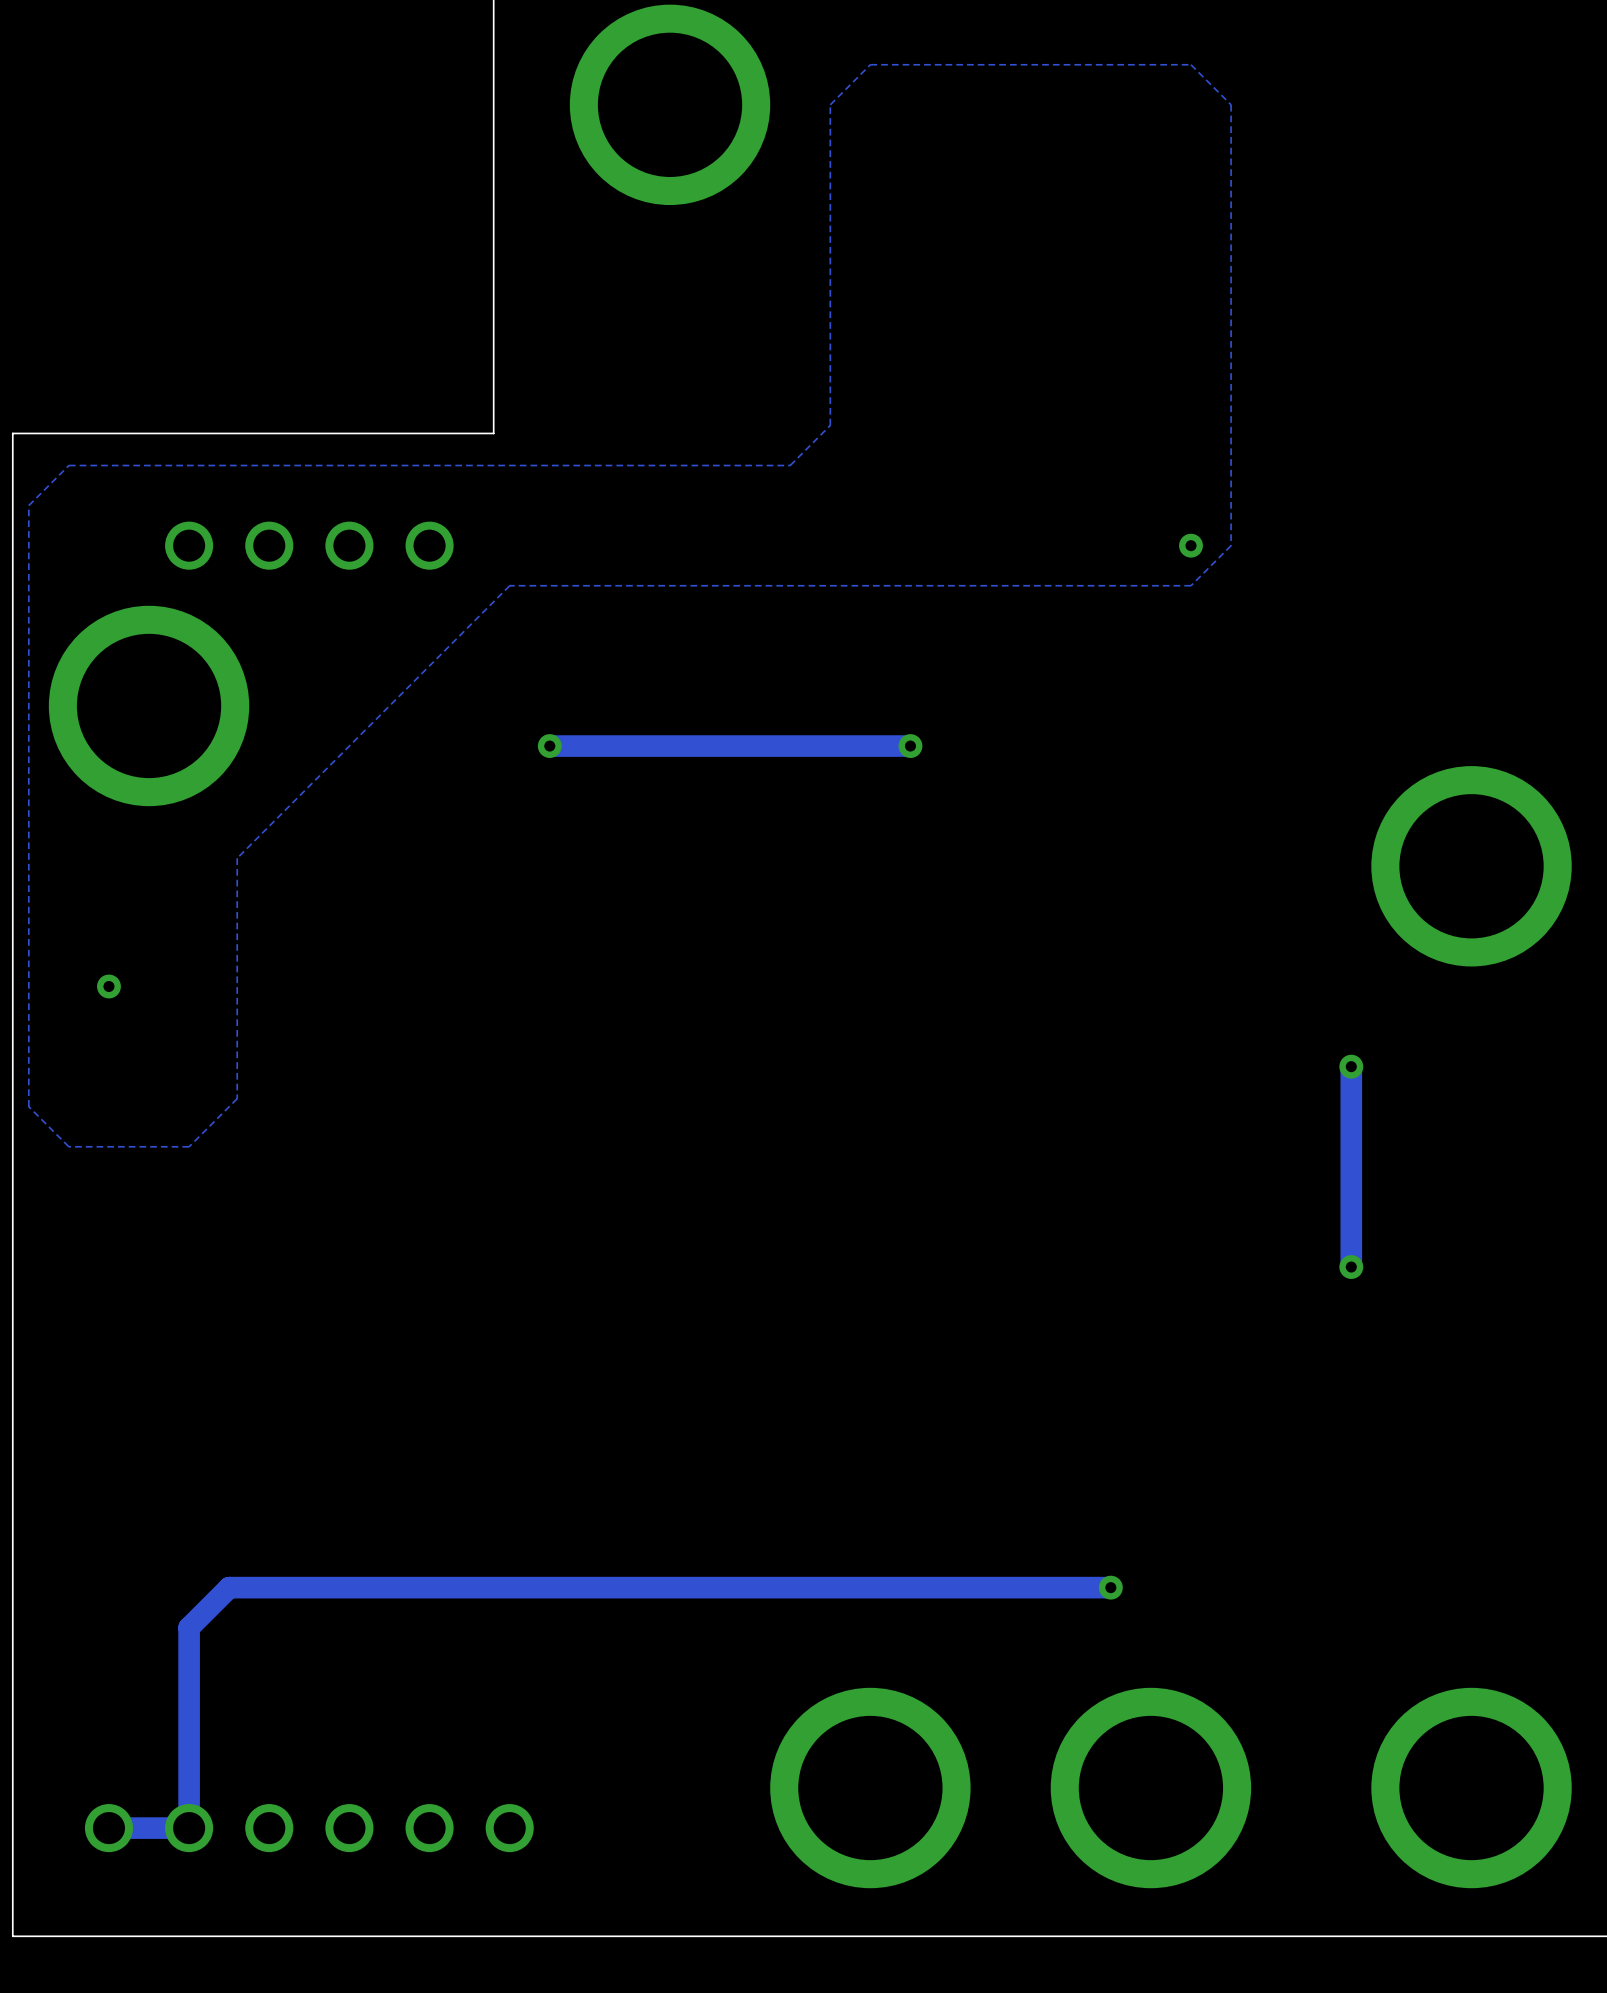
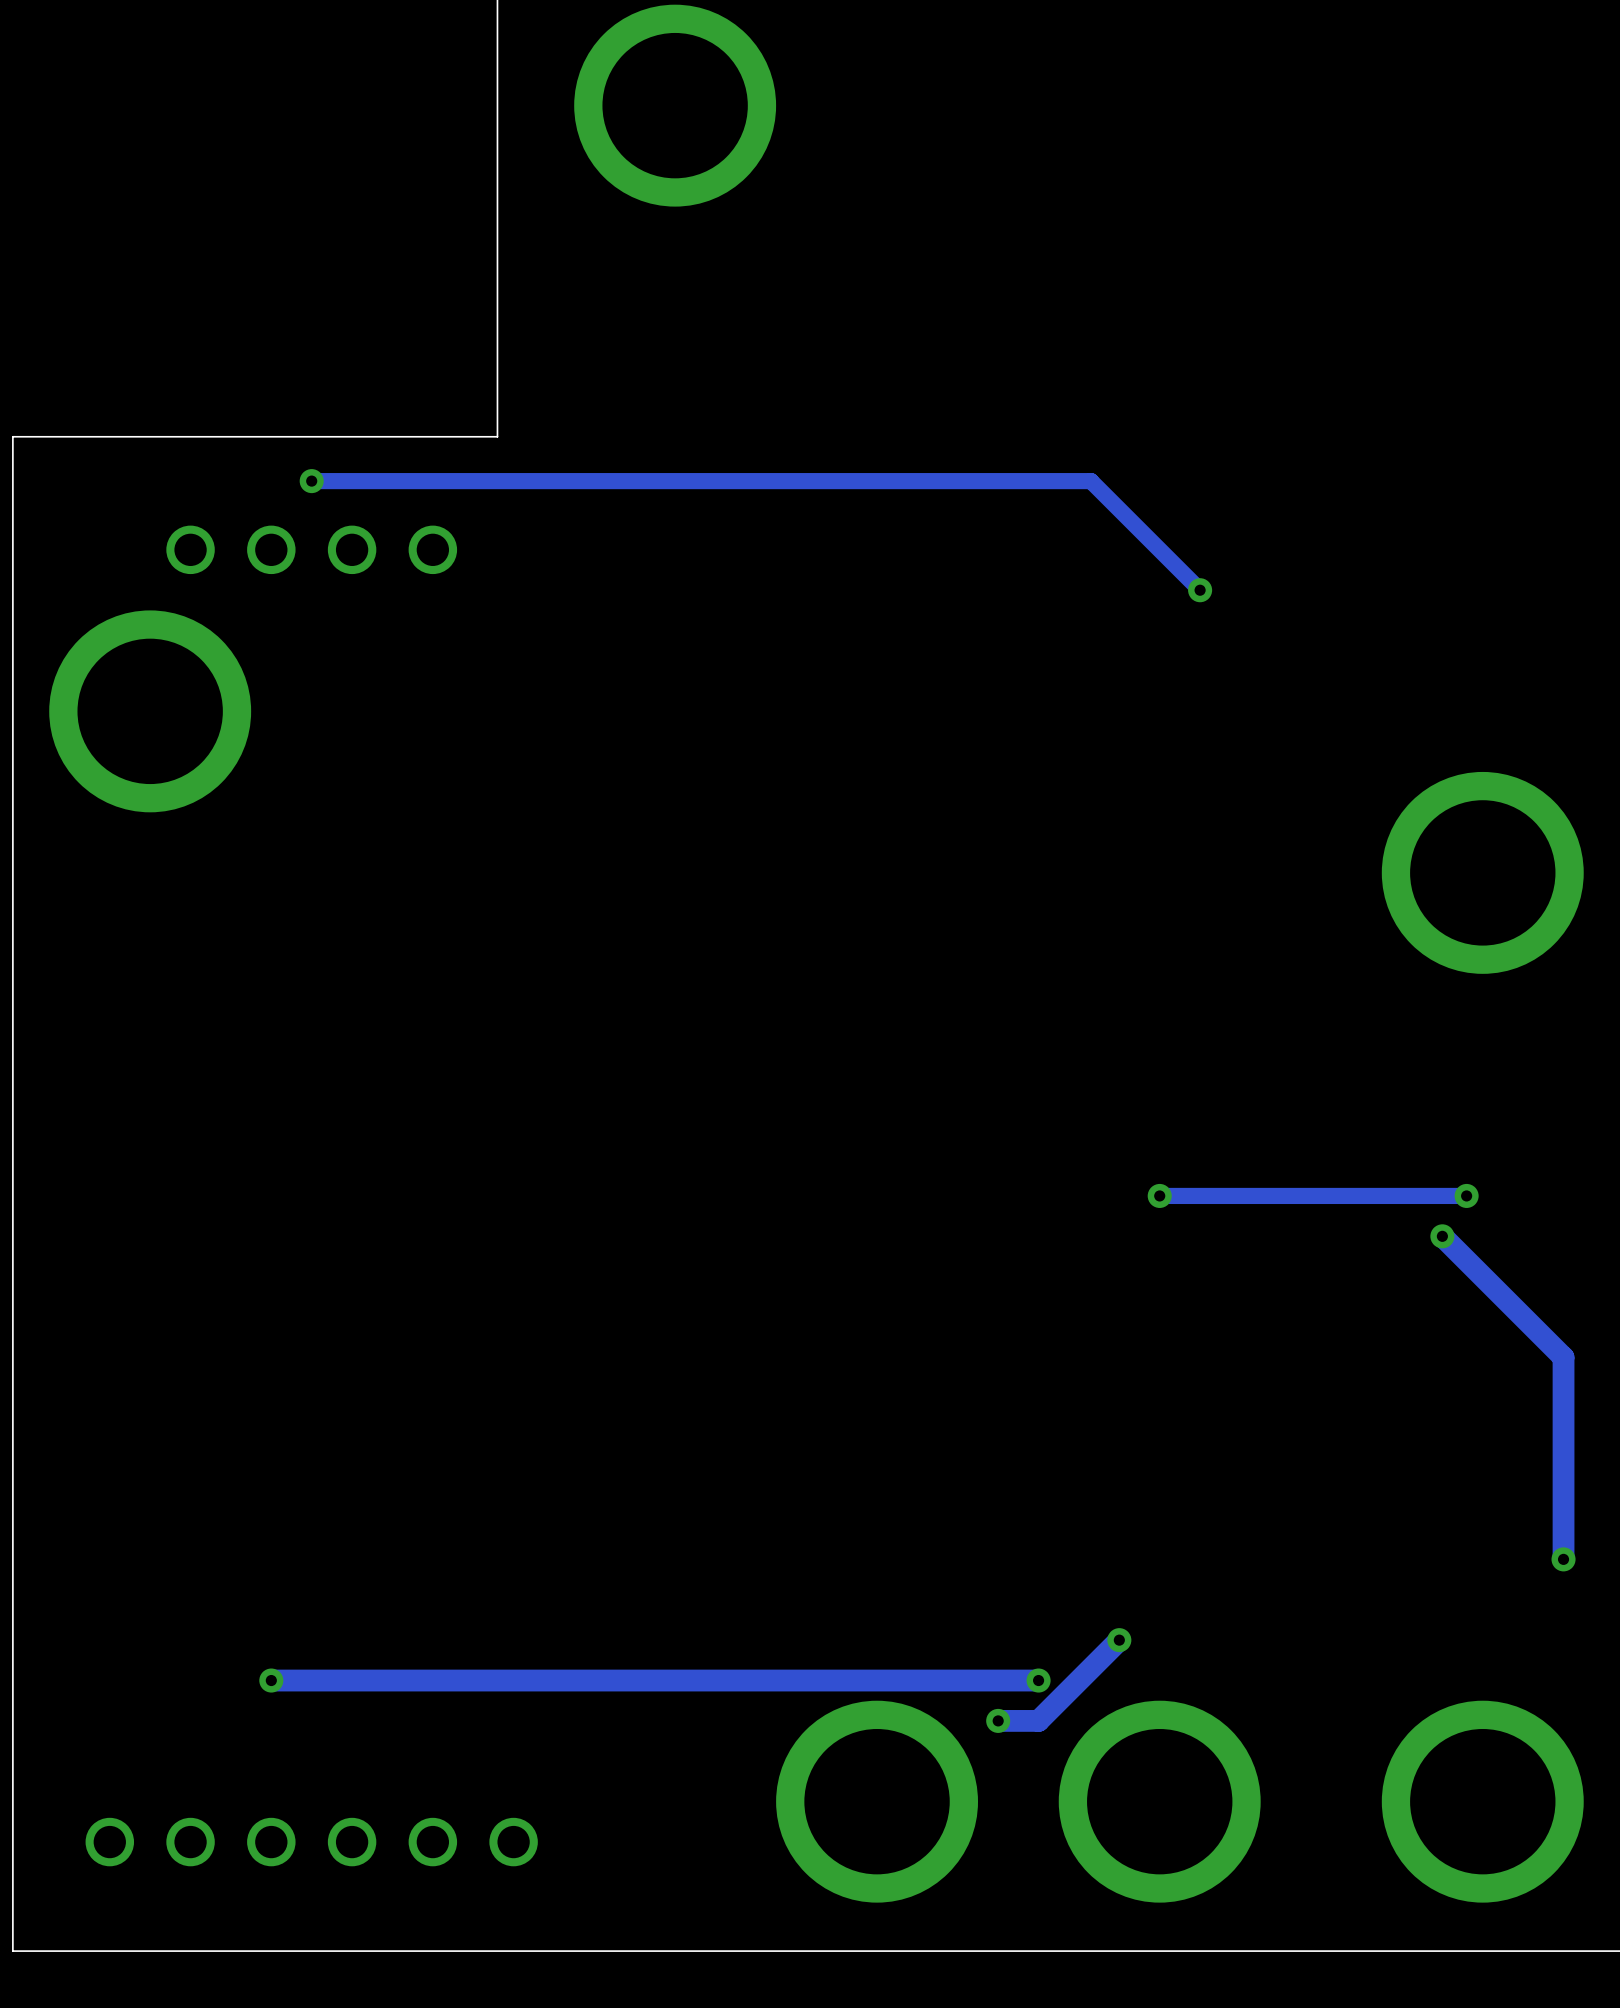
zone outline: (1191, 64) (870, 64) (830, 104) (830, 425) (790, 465) (68, 465) (28, 505) (28, 1106) (68, 1146) (189, 1146) (237, 1098) (237, 858) (509, 585) (1191, 585) (1231, 545) (1231, 104) (1191, 64) -> none
track: none -> (311, 481) (1090, 481) (1200, 590)
via: none -> (311, 481)
via position: (1191, 545) -> (1200, 590)
via: (549, 746) -> none
track: (910, 746) (549, 746) -> none
via: (910, 746) -> none
via: (108, 986) -> none
track: (1351, 1066) (1351, 1267) -> none
via: (1351, 1066) -> none
via: none -> (1159, 1195)
track: none -> (1466, 1195) (1159, 1195)
via: none -> (1466, 1195)
track: none -> (1442, 1236) (1563, 1357) (1563, 1559)
via: none -> (1442, 1236)
via: (1351, 1267) -> none
via: none -> (1563, 1559)
track: (1110, 1587) (229, 1587) (189, 1627) (189, 1828) (108, 1828) -> none
via position: (1110, 1587) -> (1119, 1640)
track: none -> (1119, 1640) (1038, 1720) (998, 1720)
via: none -> (271, 1680)
track: none -> (1038, 1680) (271, 1680)
via: none -> (1038, 1680)
via: none -> (998, 1720)

